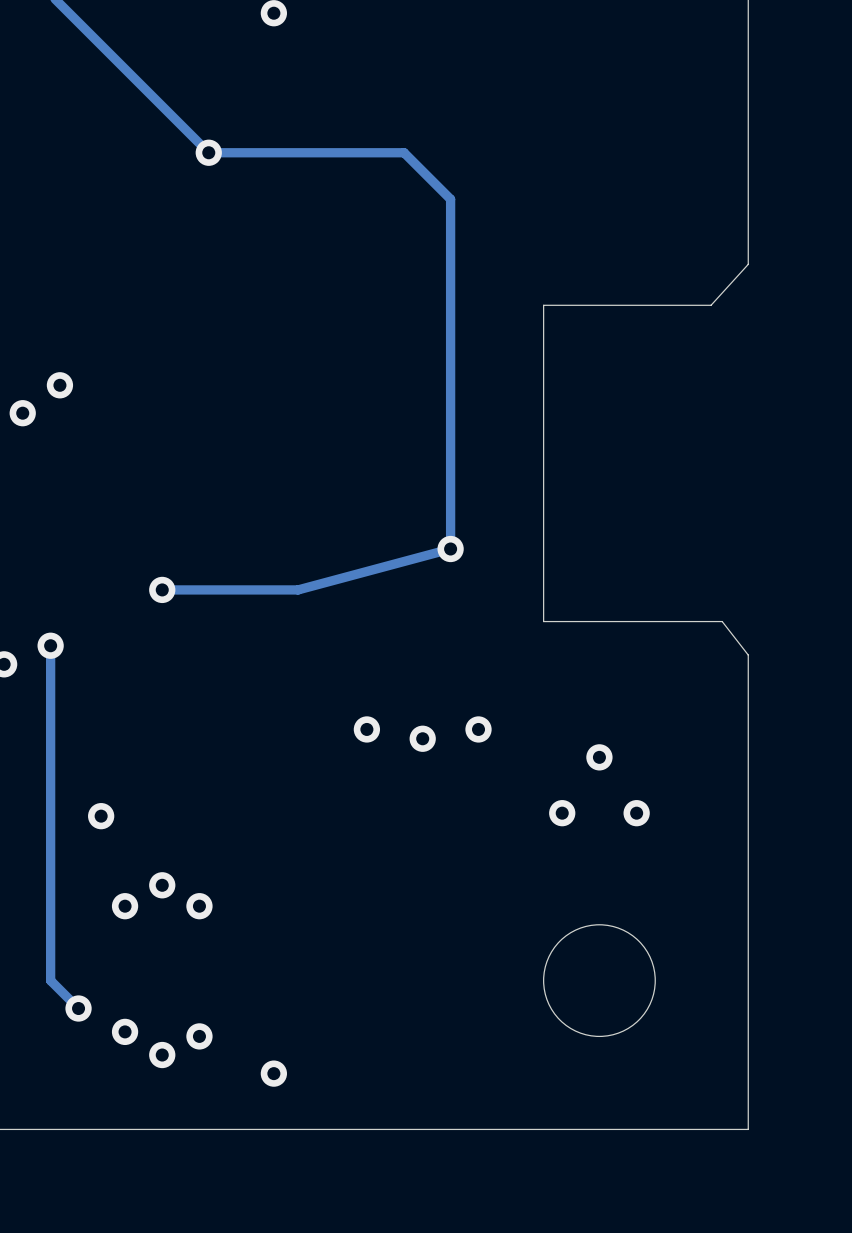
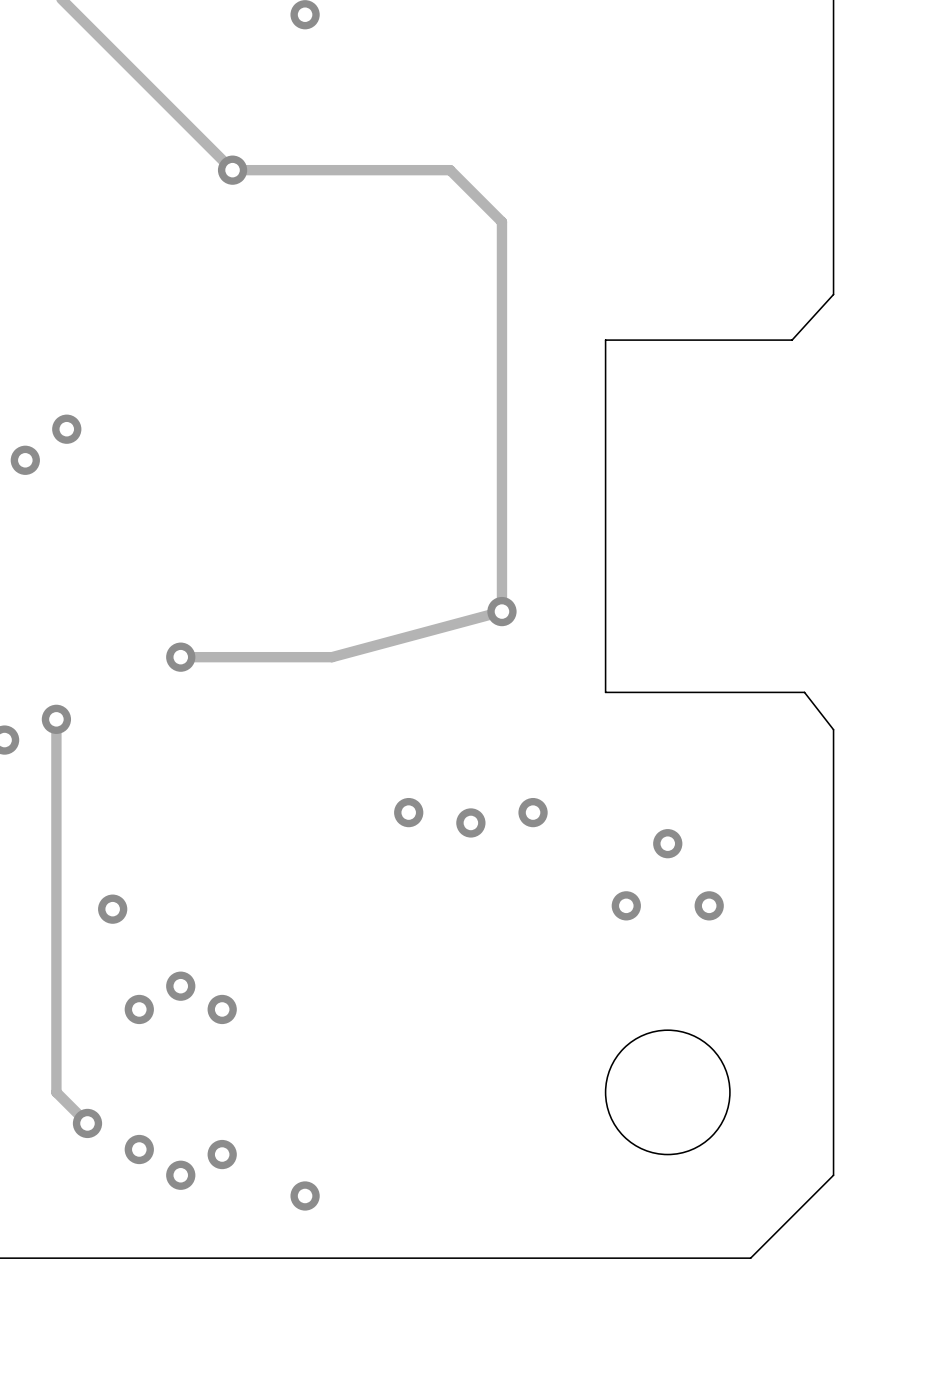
board edge: (748, 1055) (748, 1129) (673, 1129) -> (833, 1175) (750, 1258)

